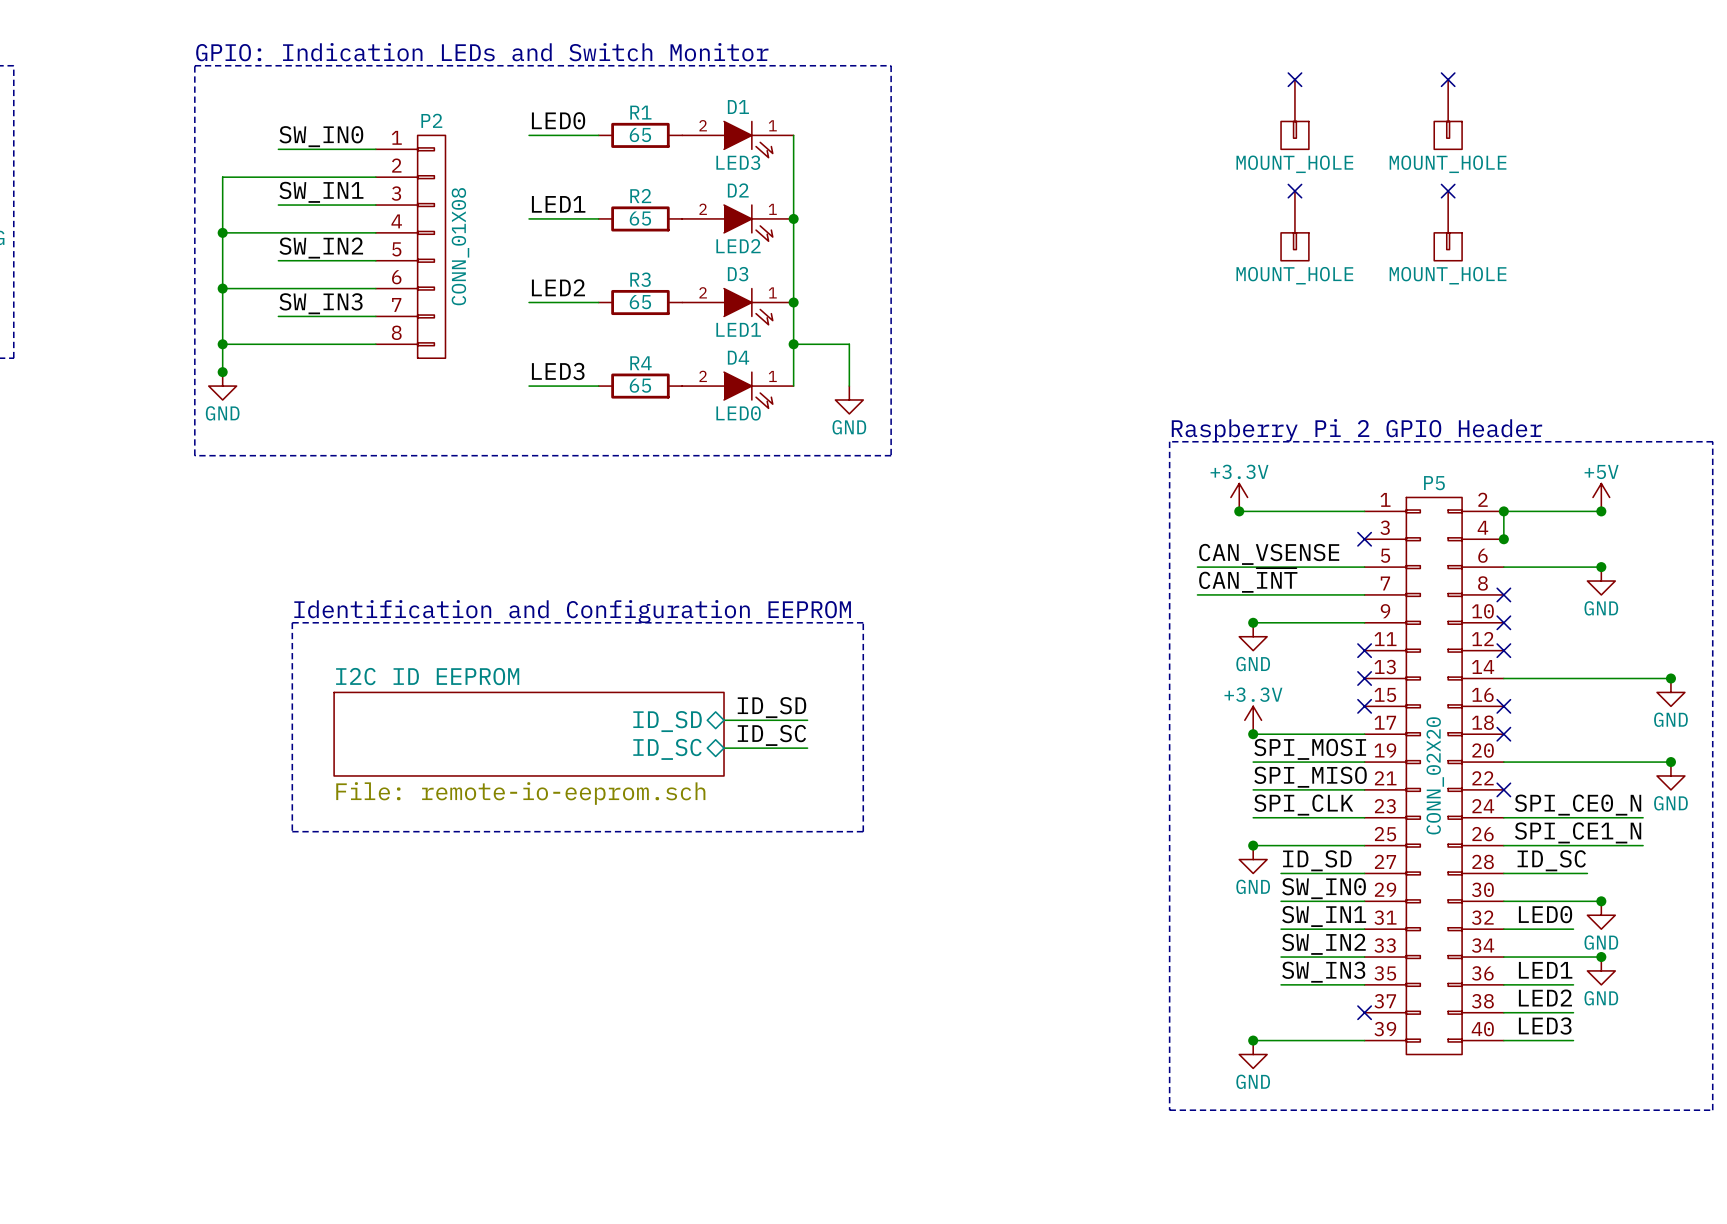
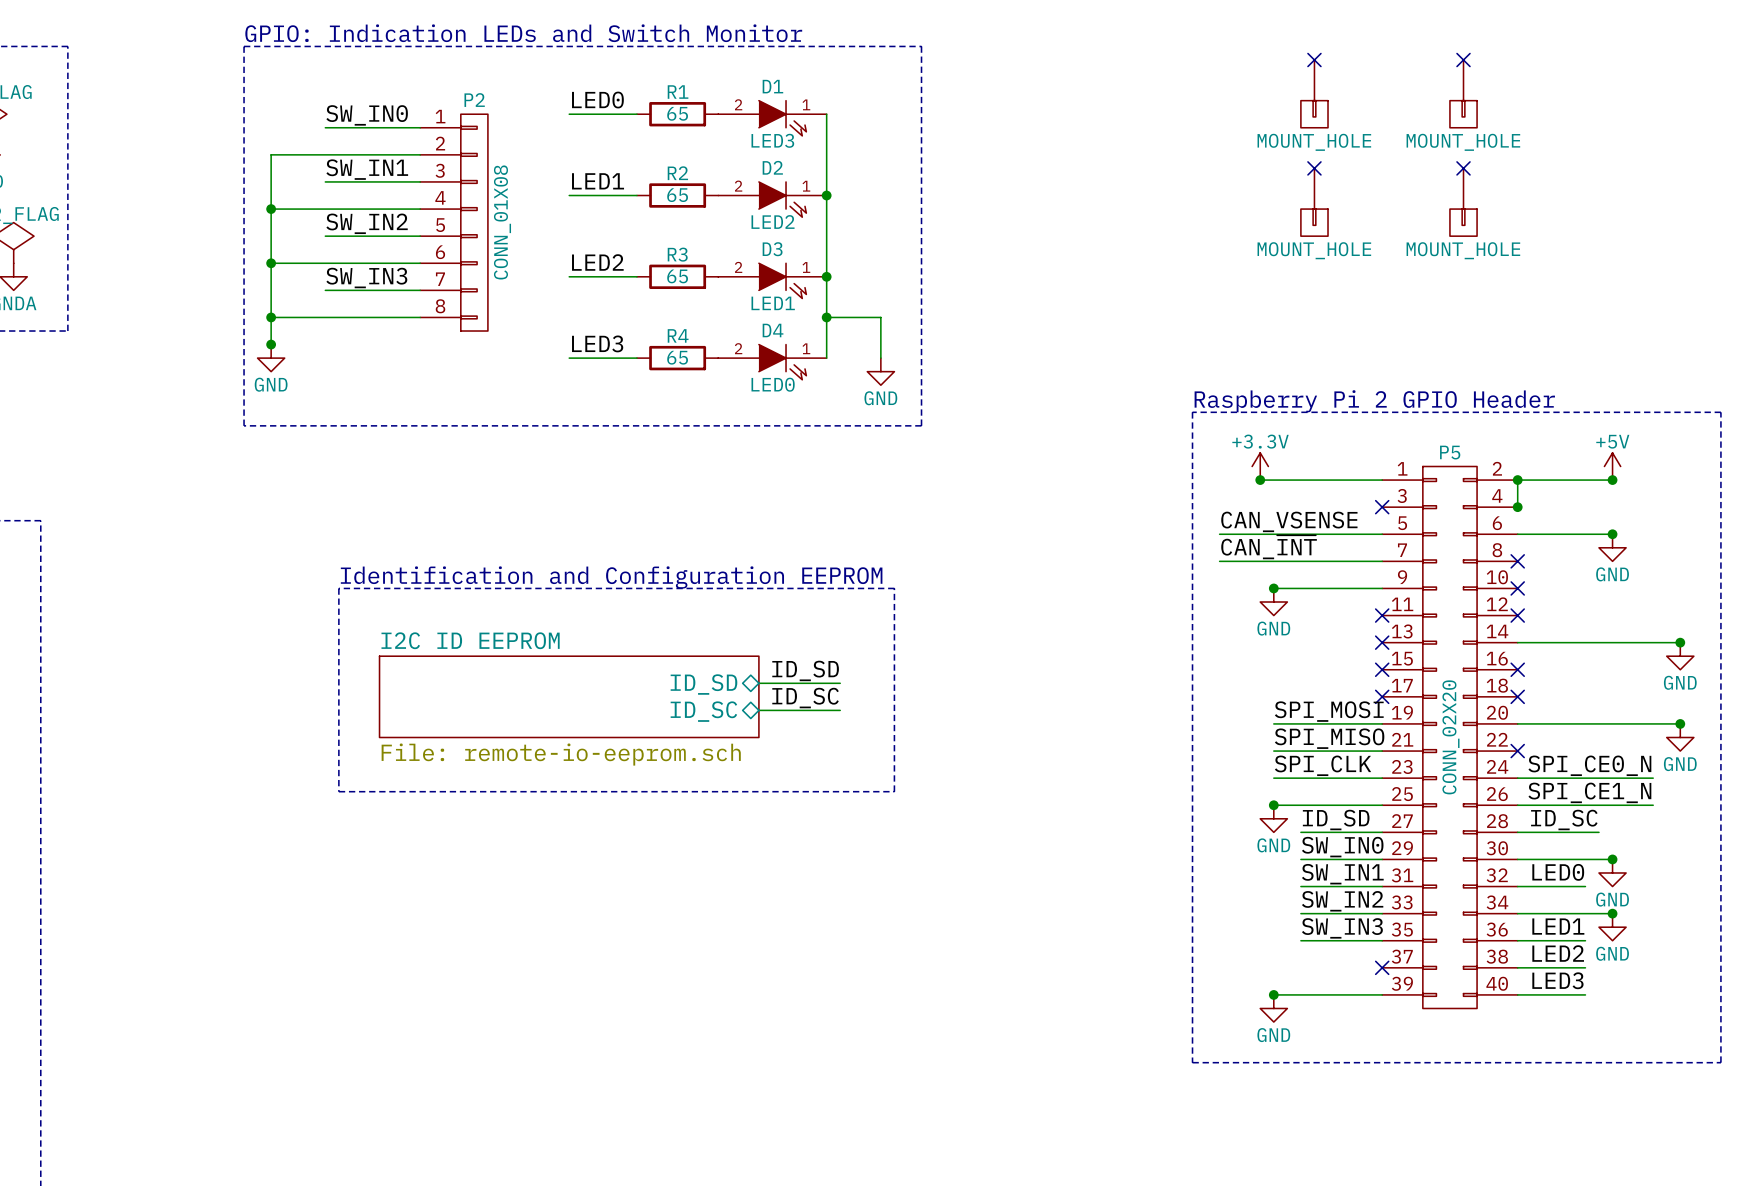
power symbol: +3.3V (1253, 720) -> none
wire: (1253, 734) (1364, 734) -> none
junction: (1253, 734) -> none
no-connect mark: none -> (1382, 696)

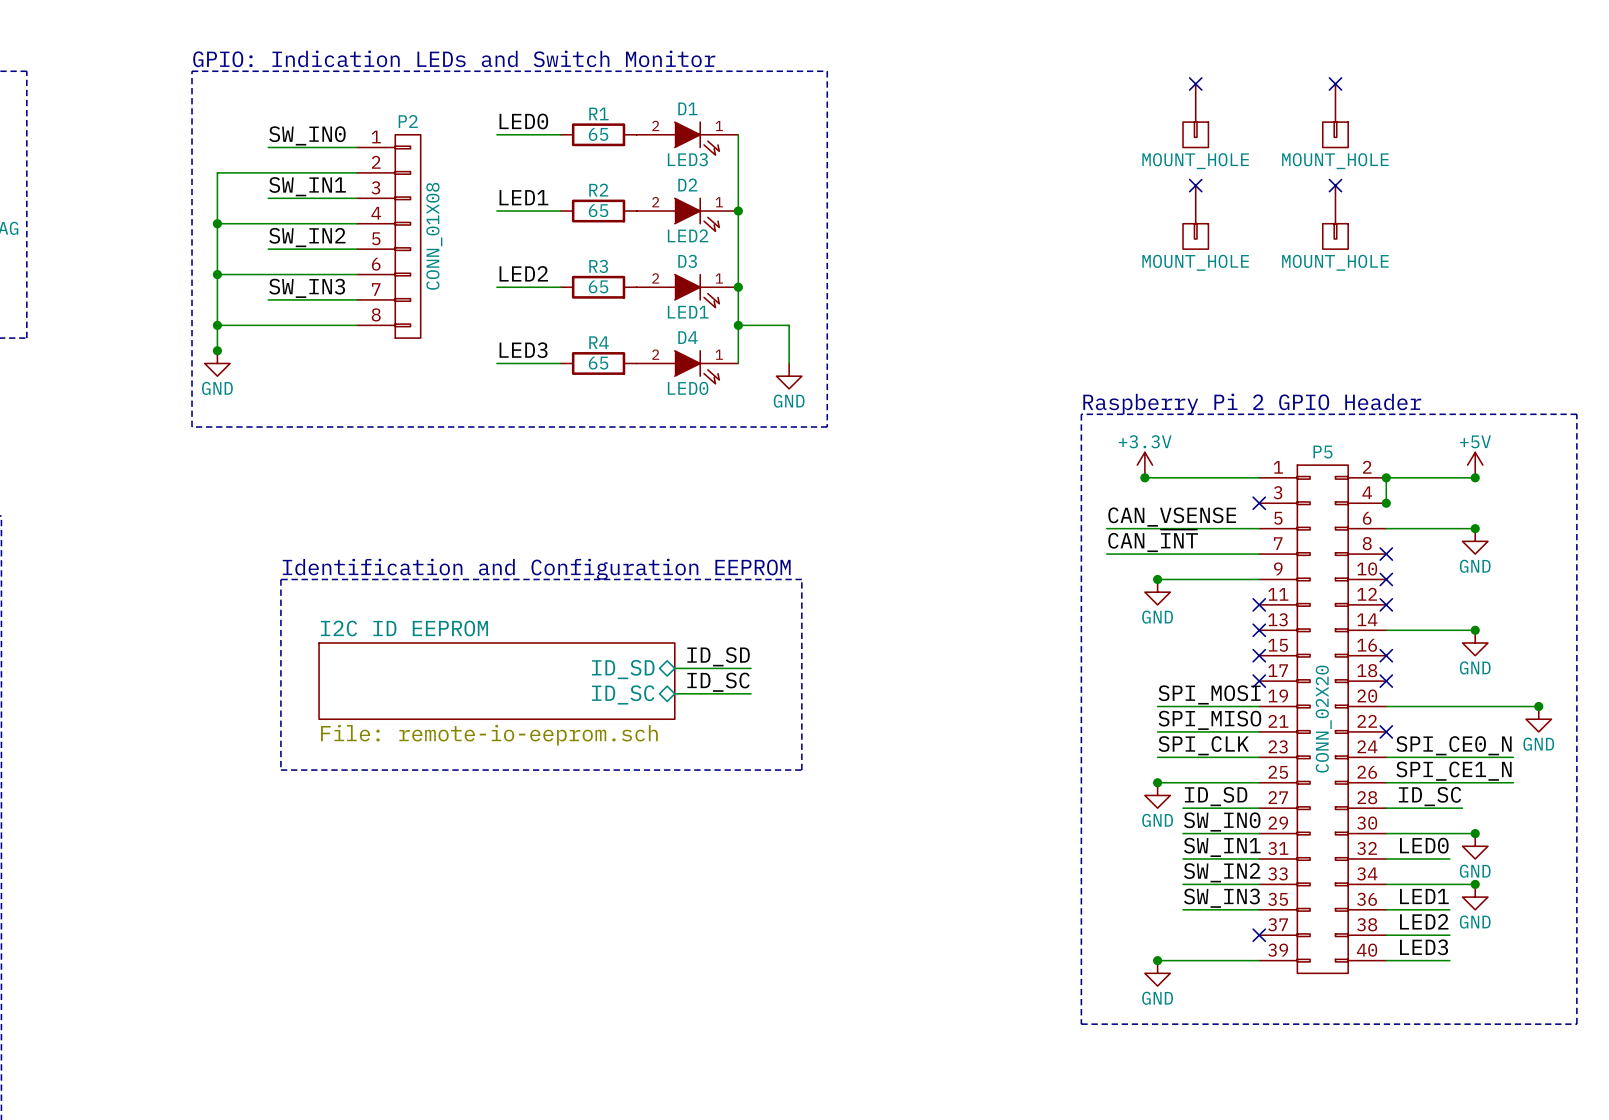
wire: (1612, 642) (1680, 642) -> none
junction: none -> (1475, 630)
junction: (1680, 642) -> none
power symbol position: GND (1680, 656) -> GND (1475, 643)

